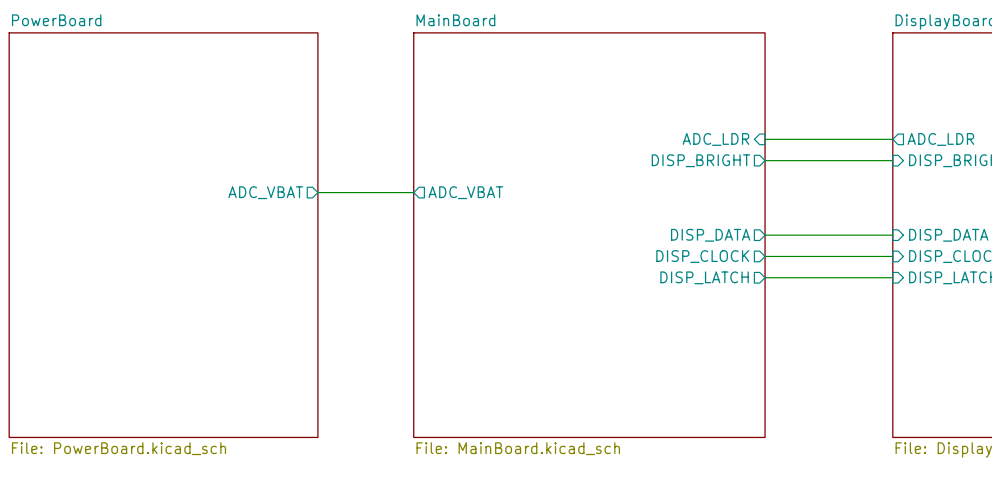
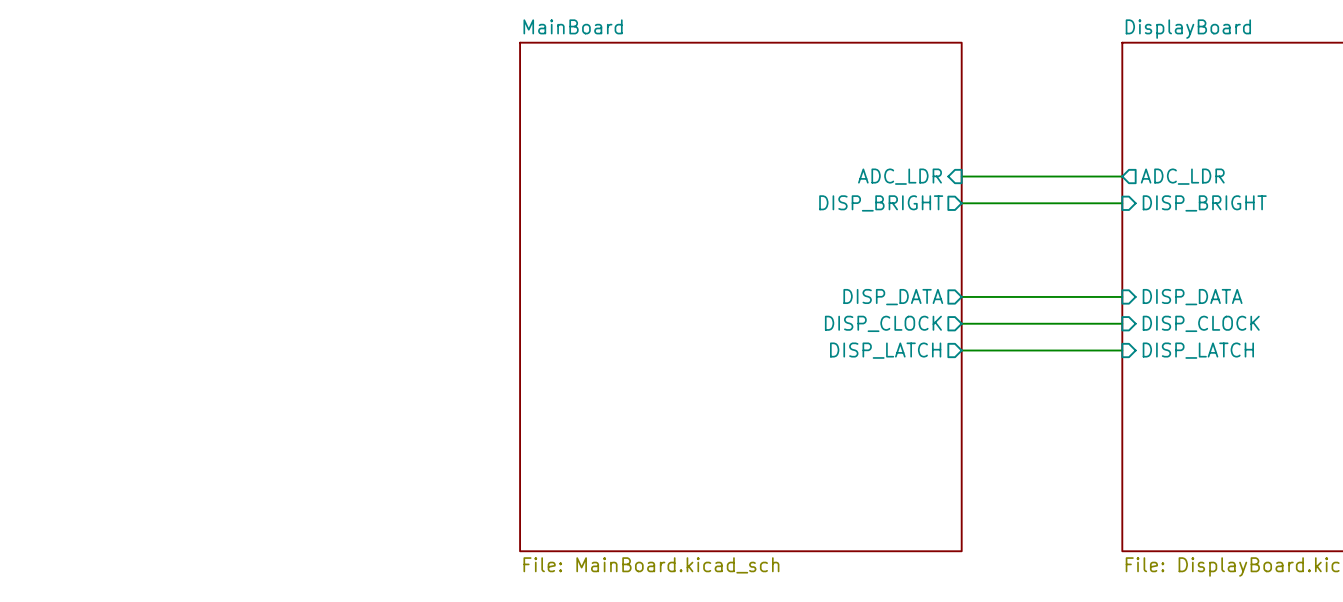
sheet pin: ADC_VBAT (265, 192) -> none
wire: (317, 192) (413, 192) -> none
sheet pin: ADC_VBAT (465, 192) -> none
sheet PowerBoard: File: PowerBoard.kicad_sch (163, 235) -> none

